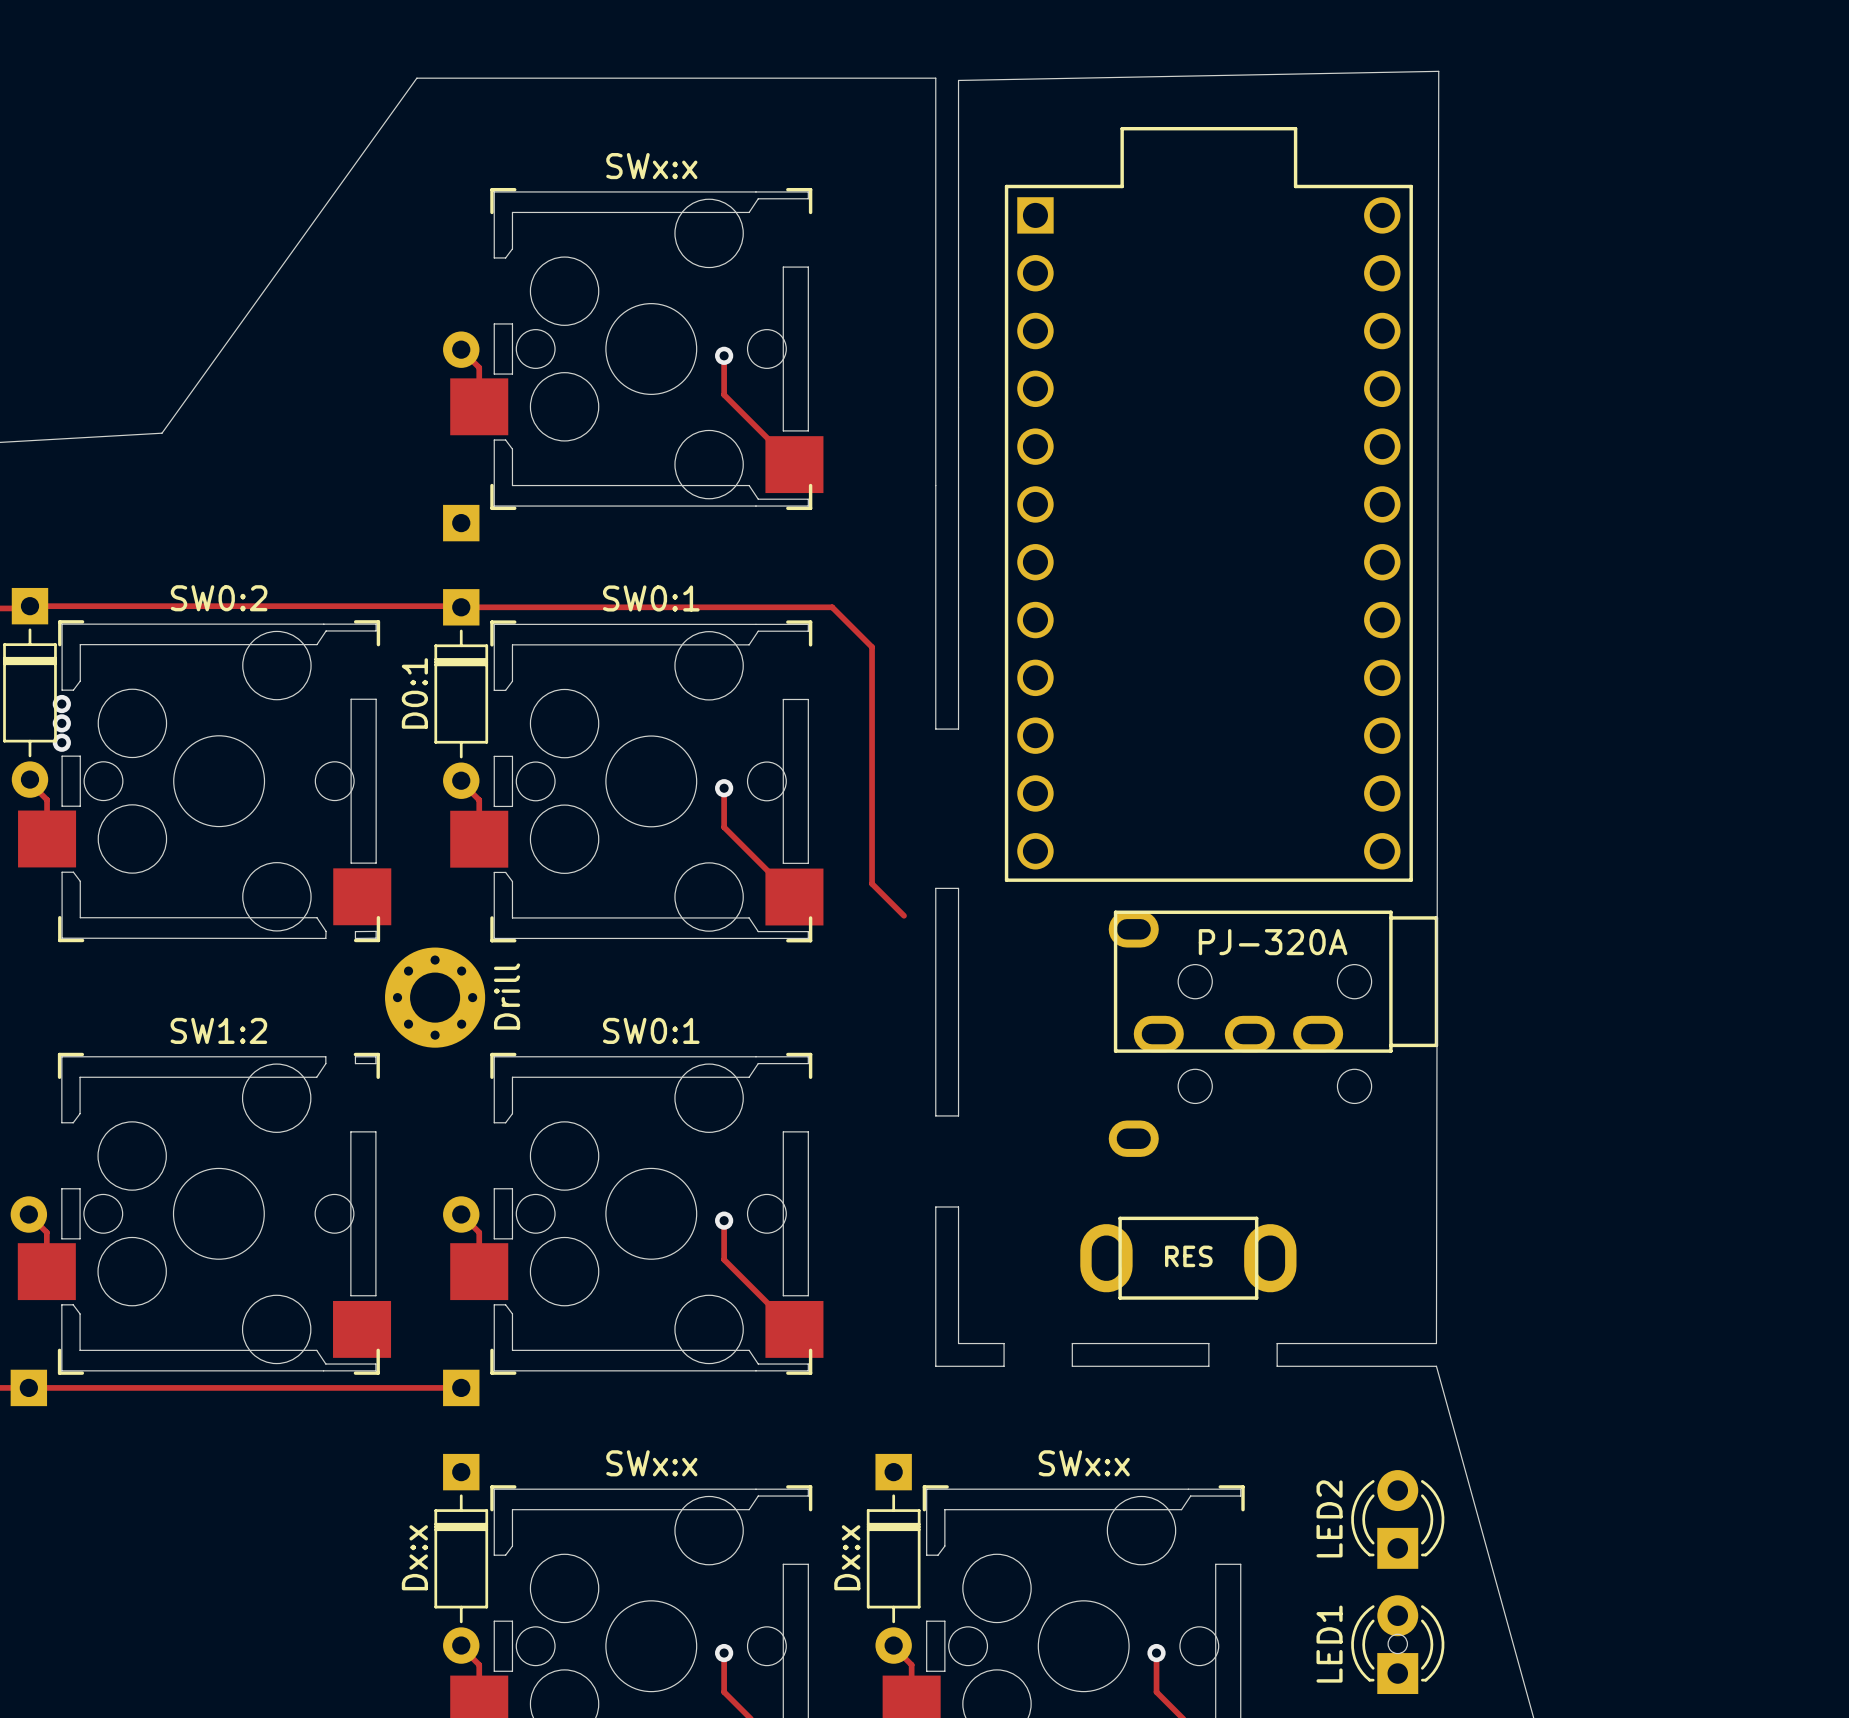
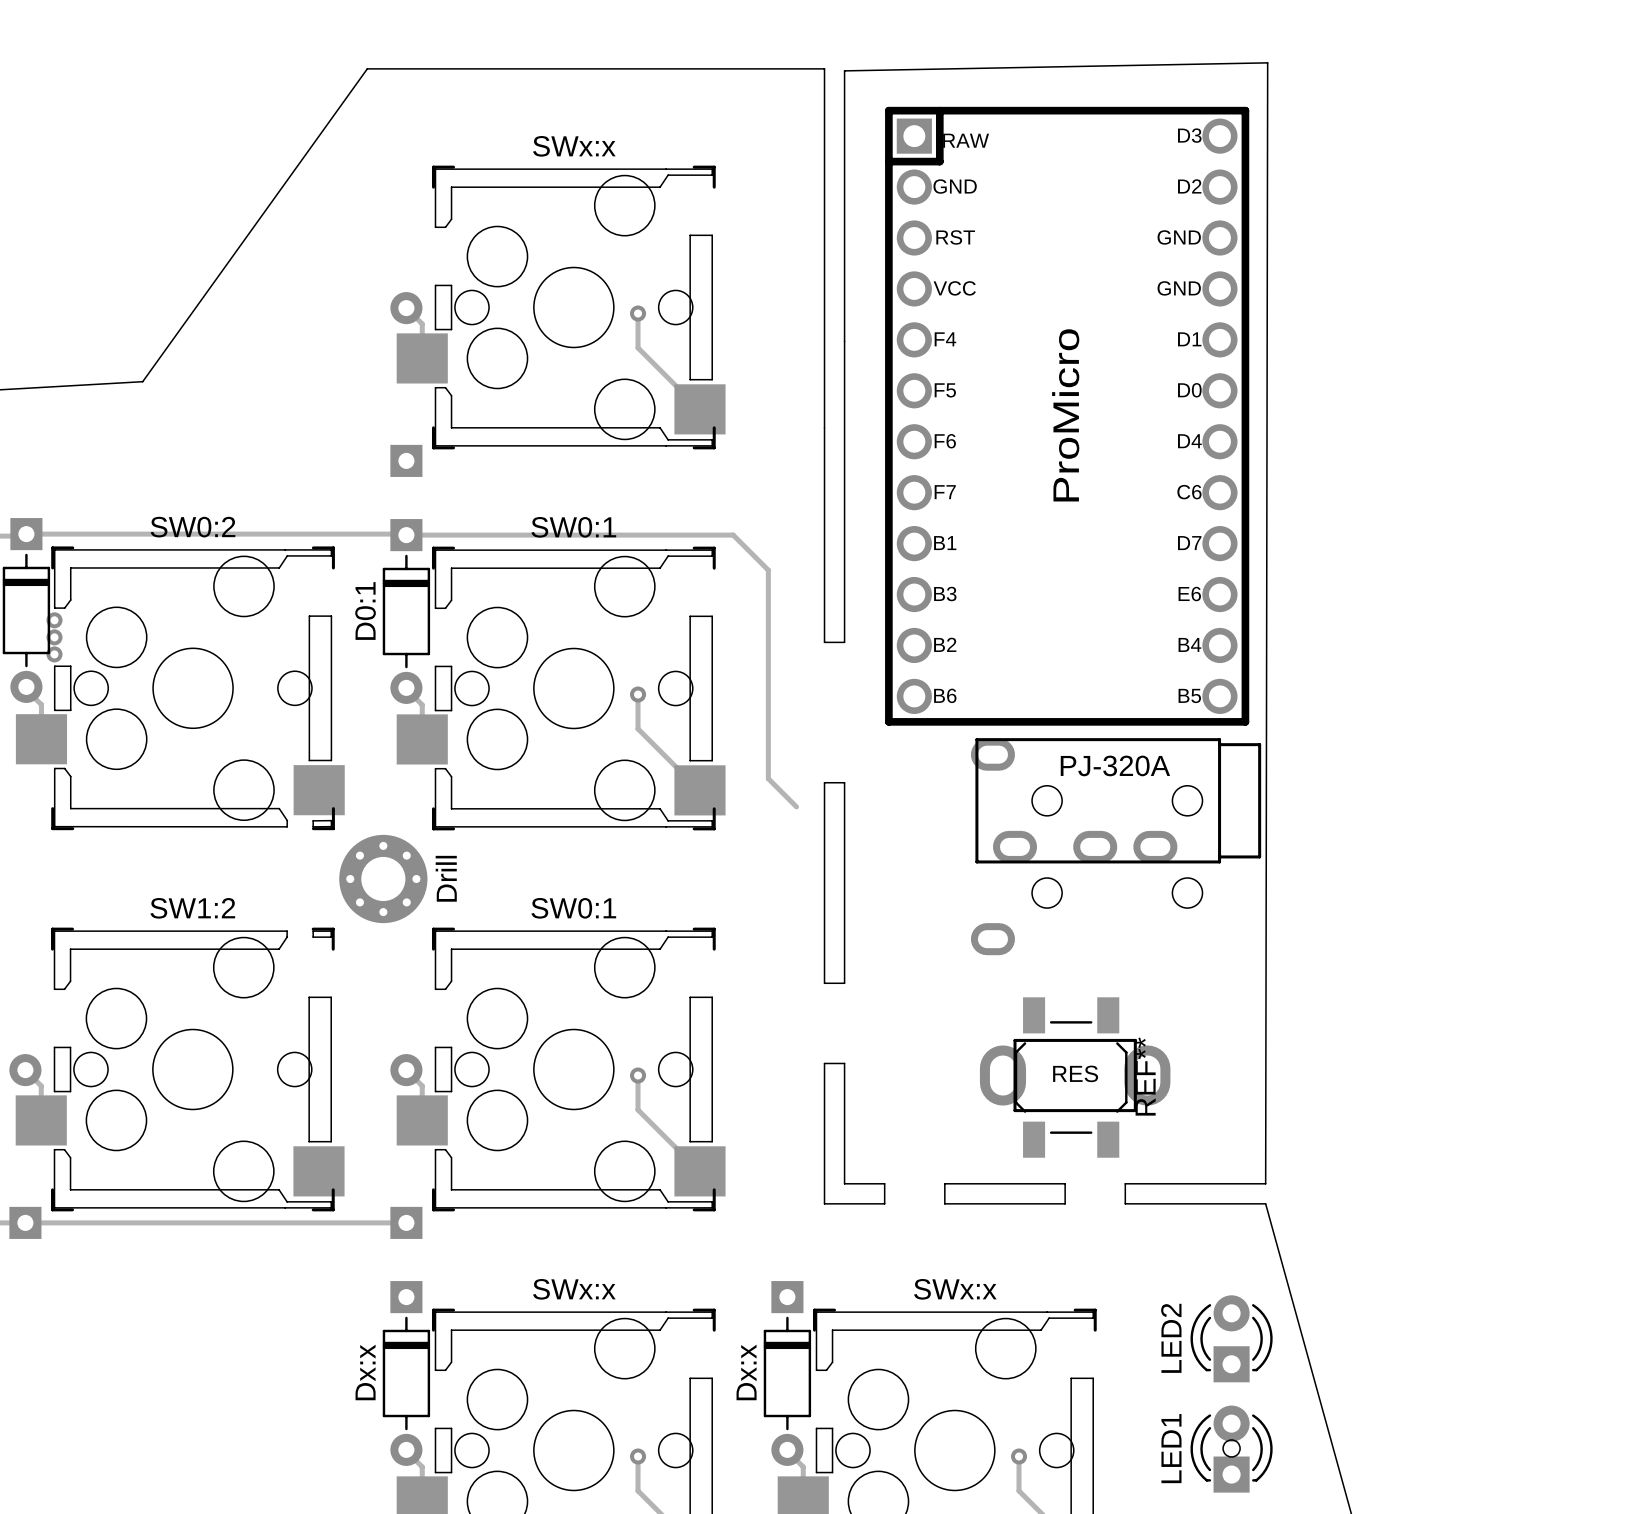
part: none -> ProMicro (1067, 416)
part: (1208, 504) -> none
part position: (1273, 1033) -> (1116, 846)
REF**: none -> (1071, 1077)
part position: (1188, 1258) -> (1075, 1075)

